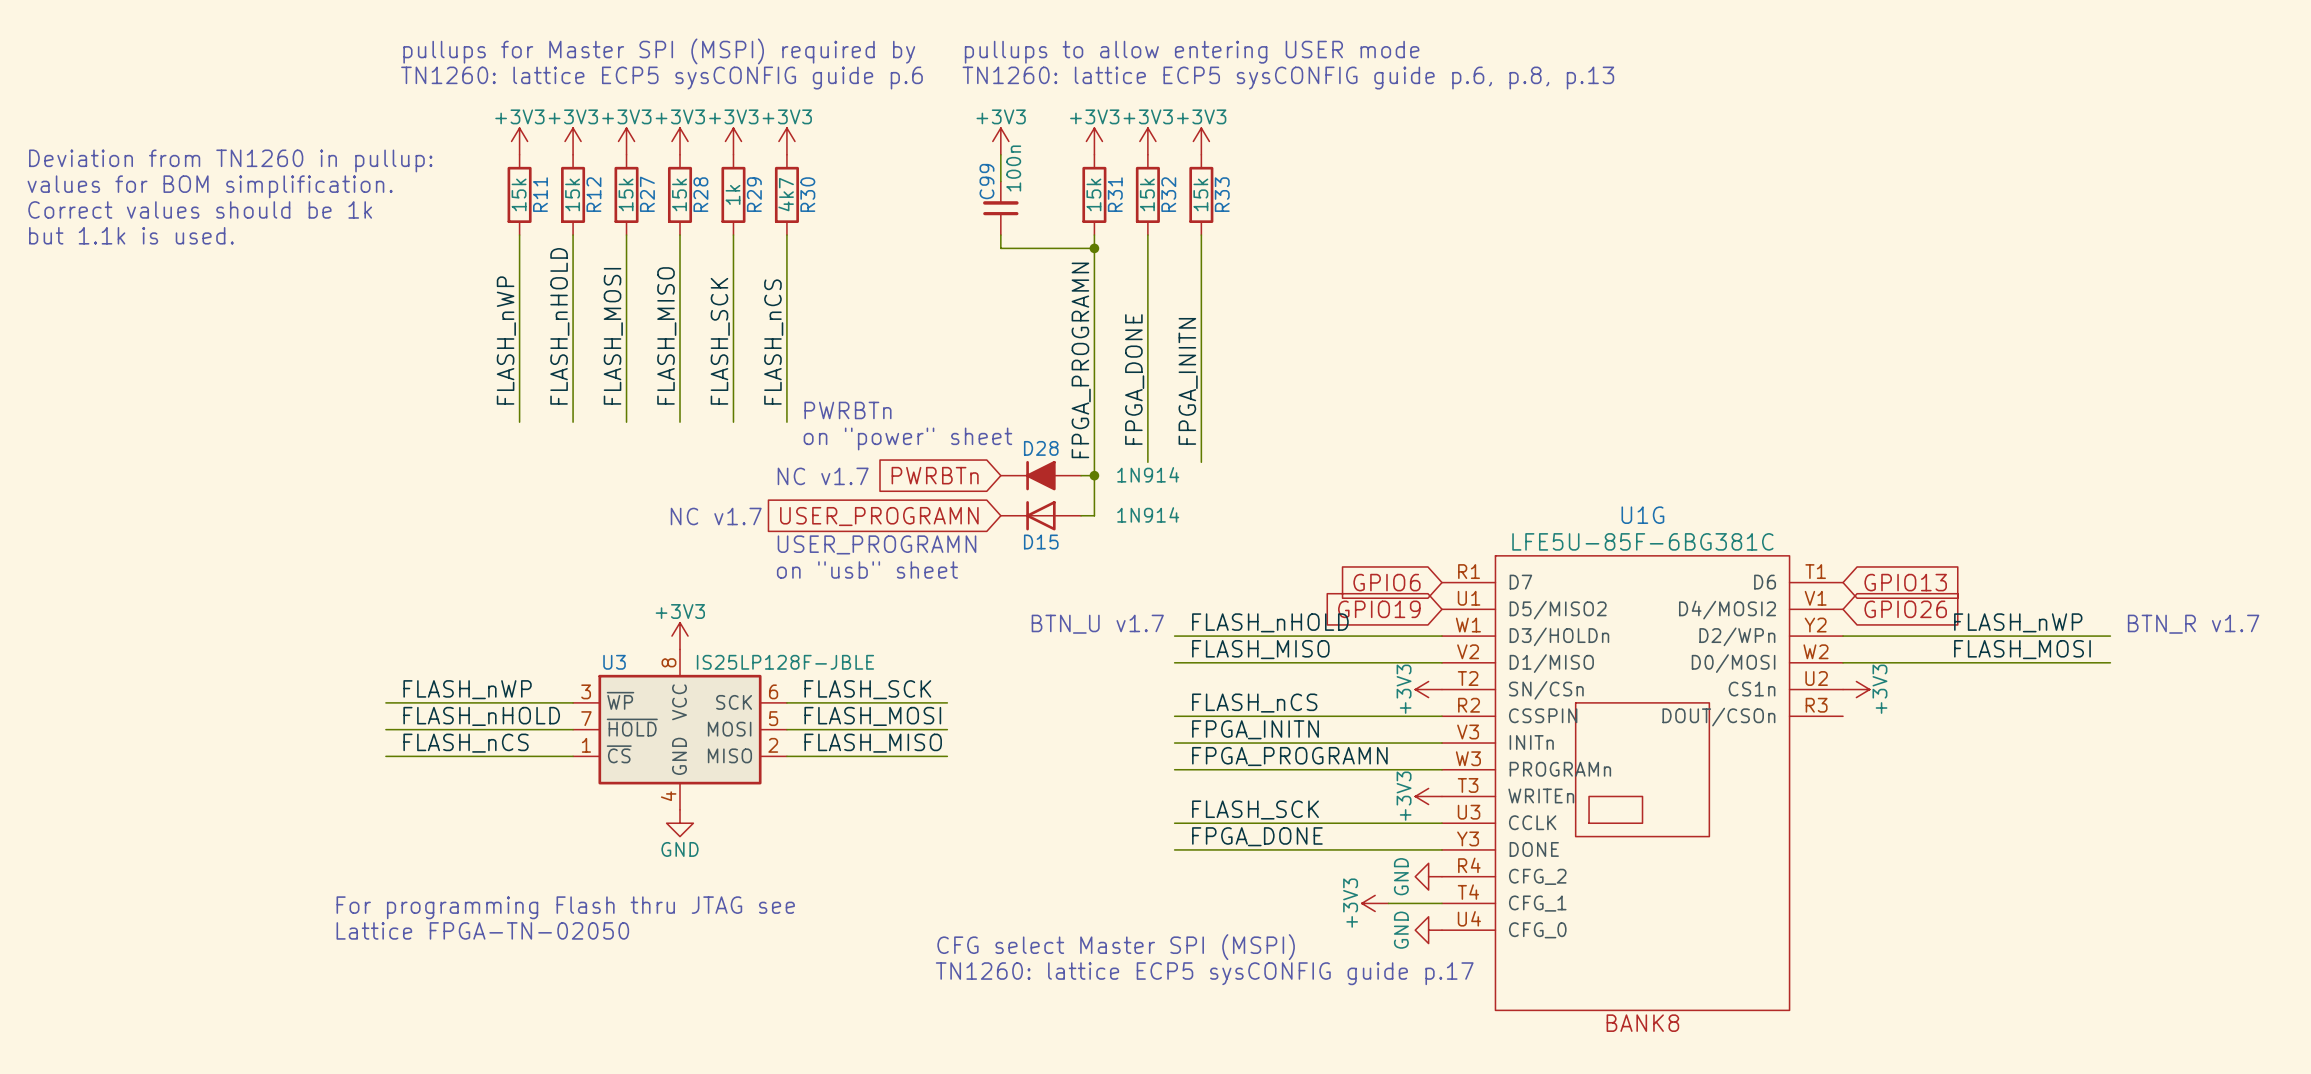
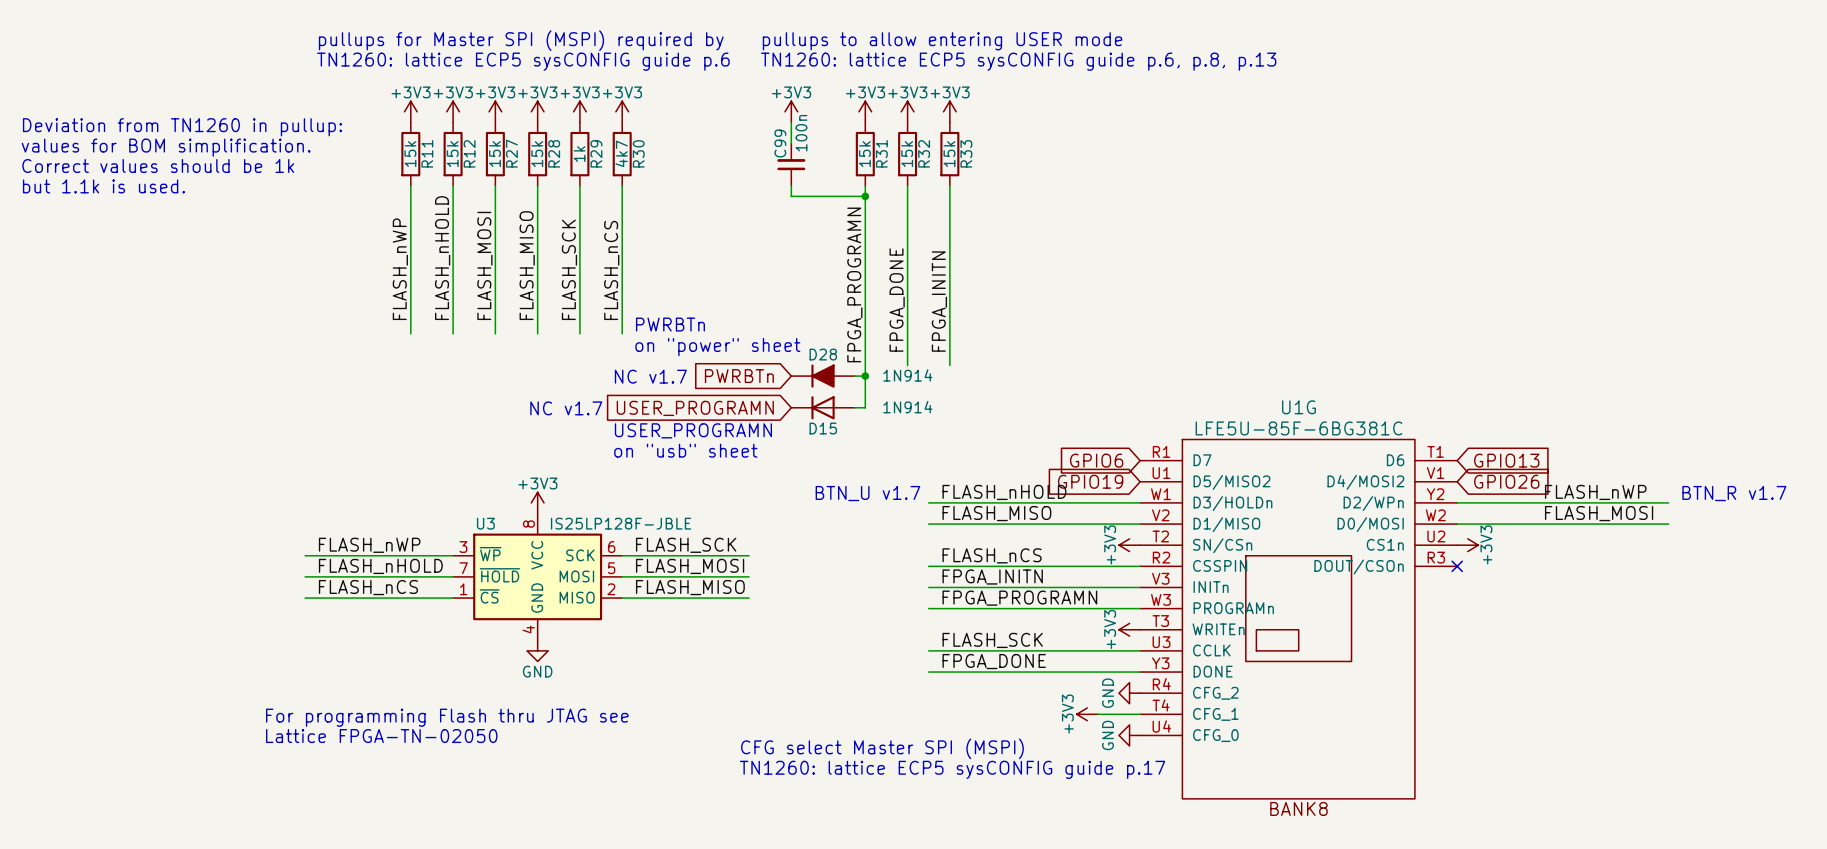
no-connect mark: none -> (1457, 566)

